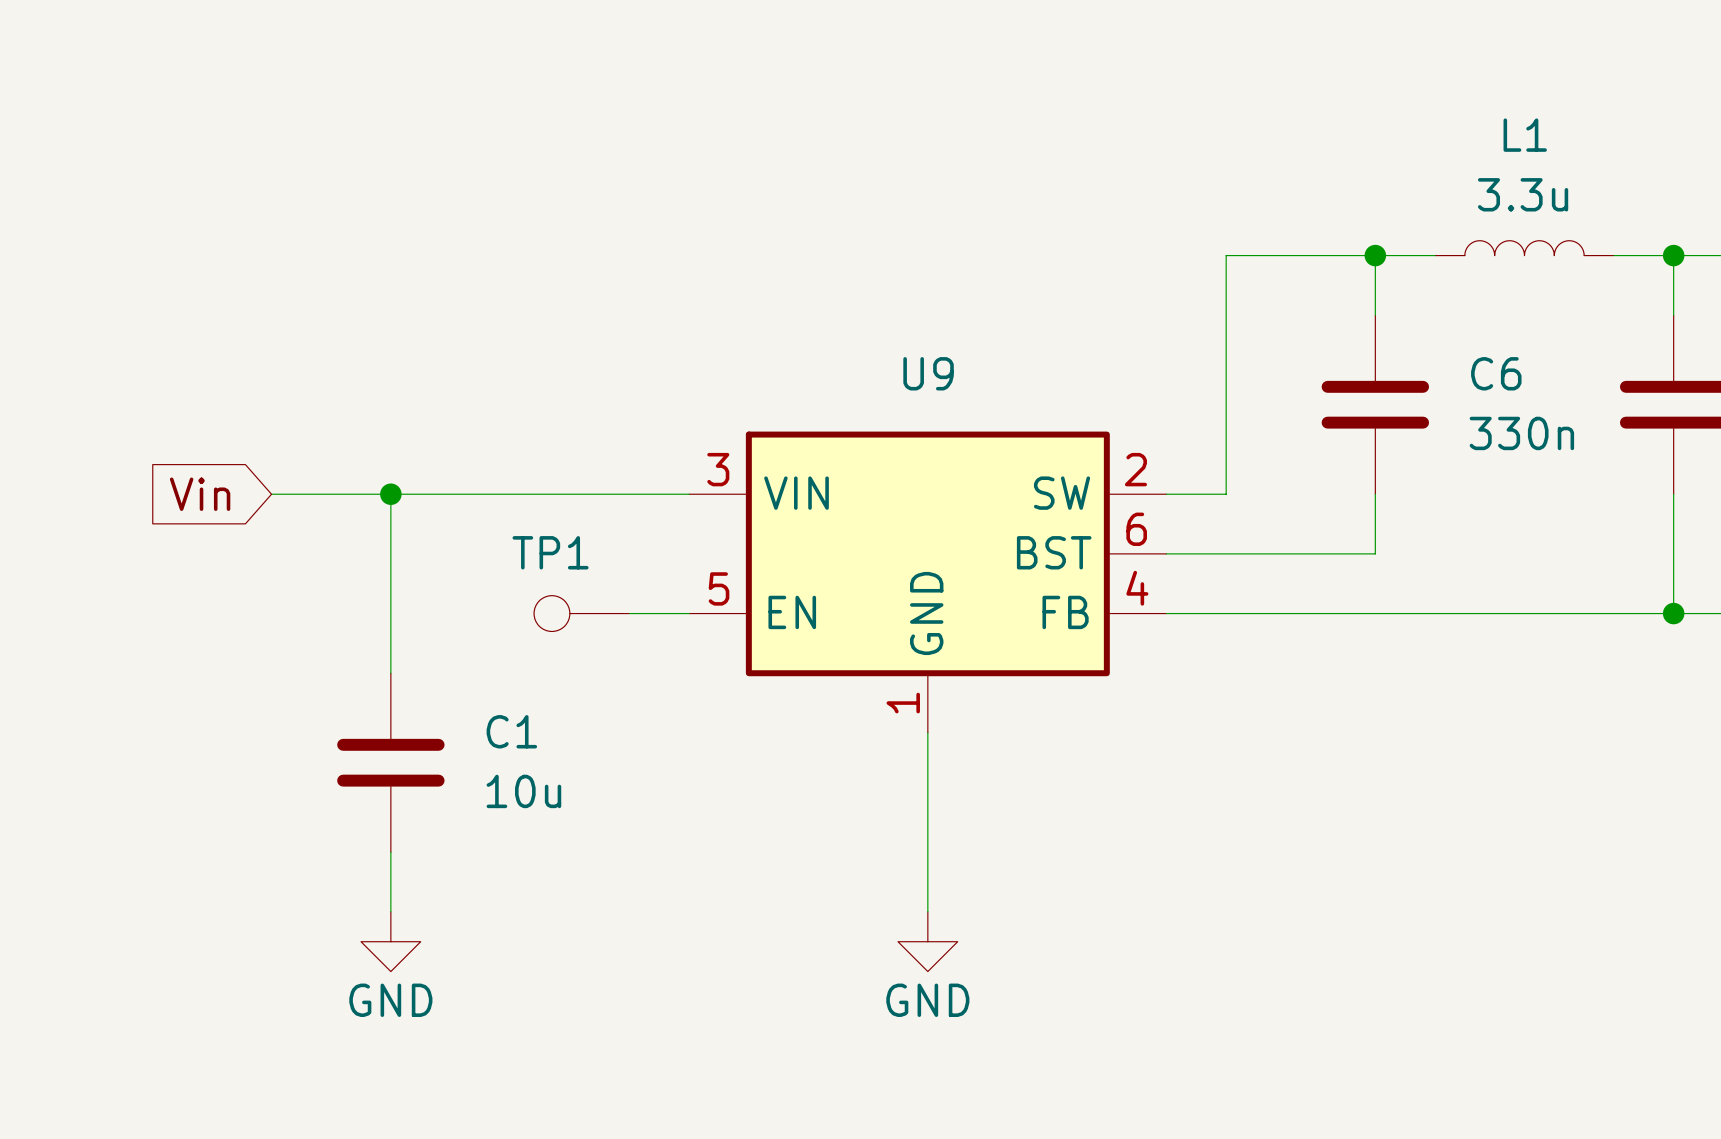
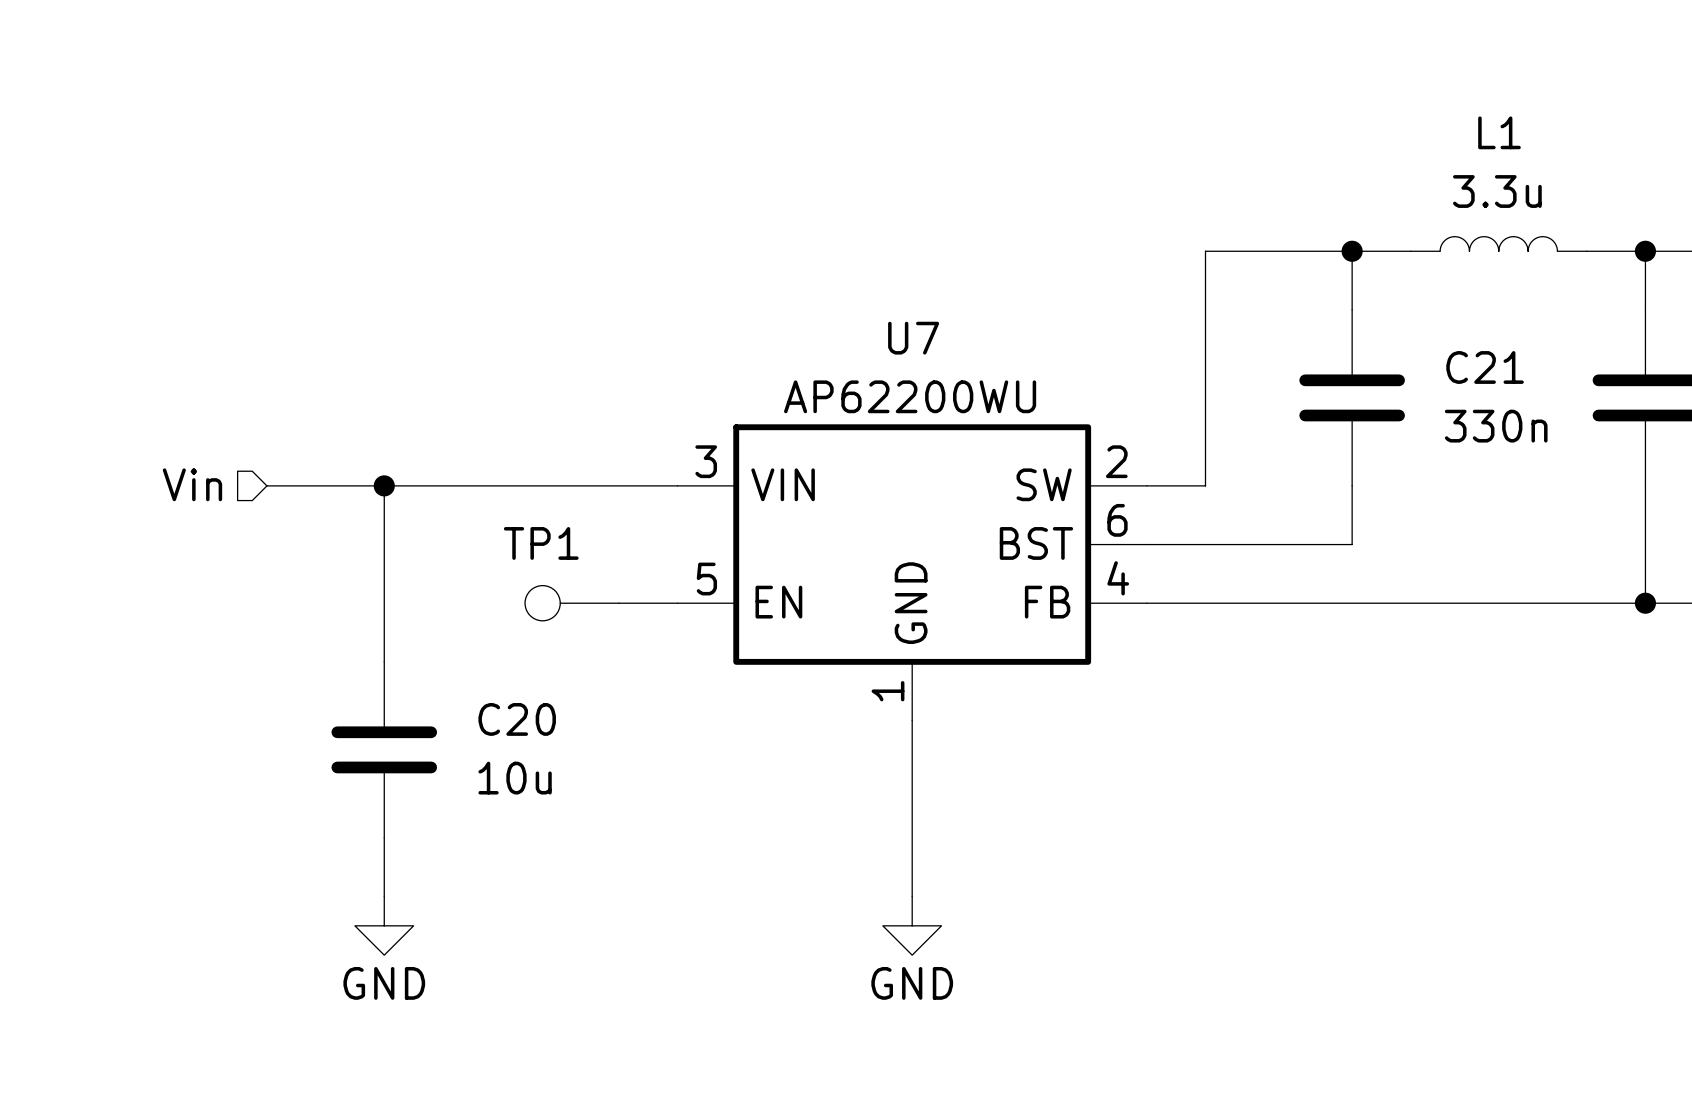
U9 name: U9 (928, 373) -> U7 (913, 338)
C6 name: C6 (1496, 373) -> C21 (1485, 367)
U9 value: none -> AP62200WU (910, 396)
hierarchical label: none -> Vin (192, 484)
global label: Vin (200, 494) -> none
C1 name: C1 (511, 731) -> C20 (517, 719)

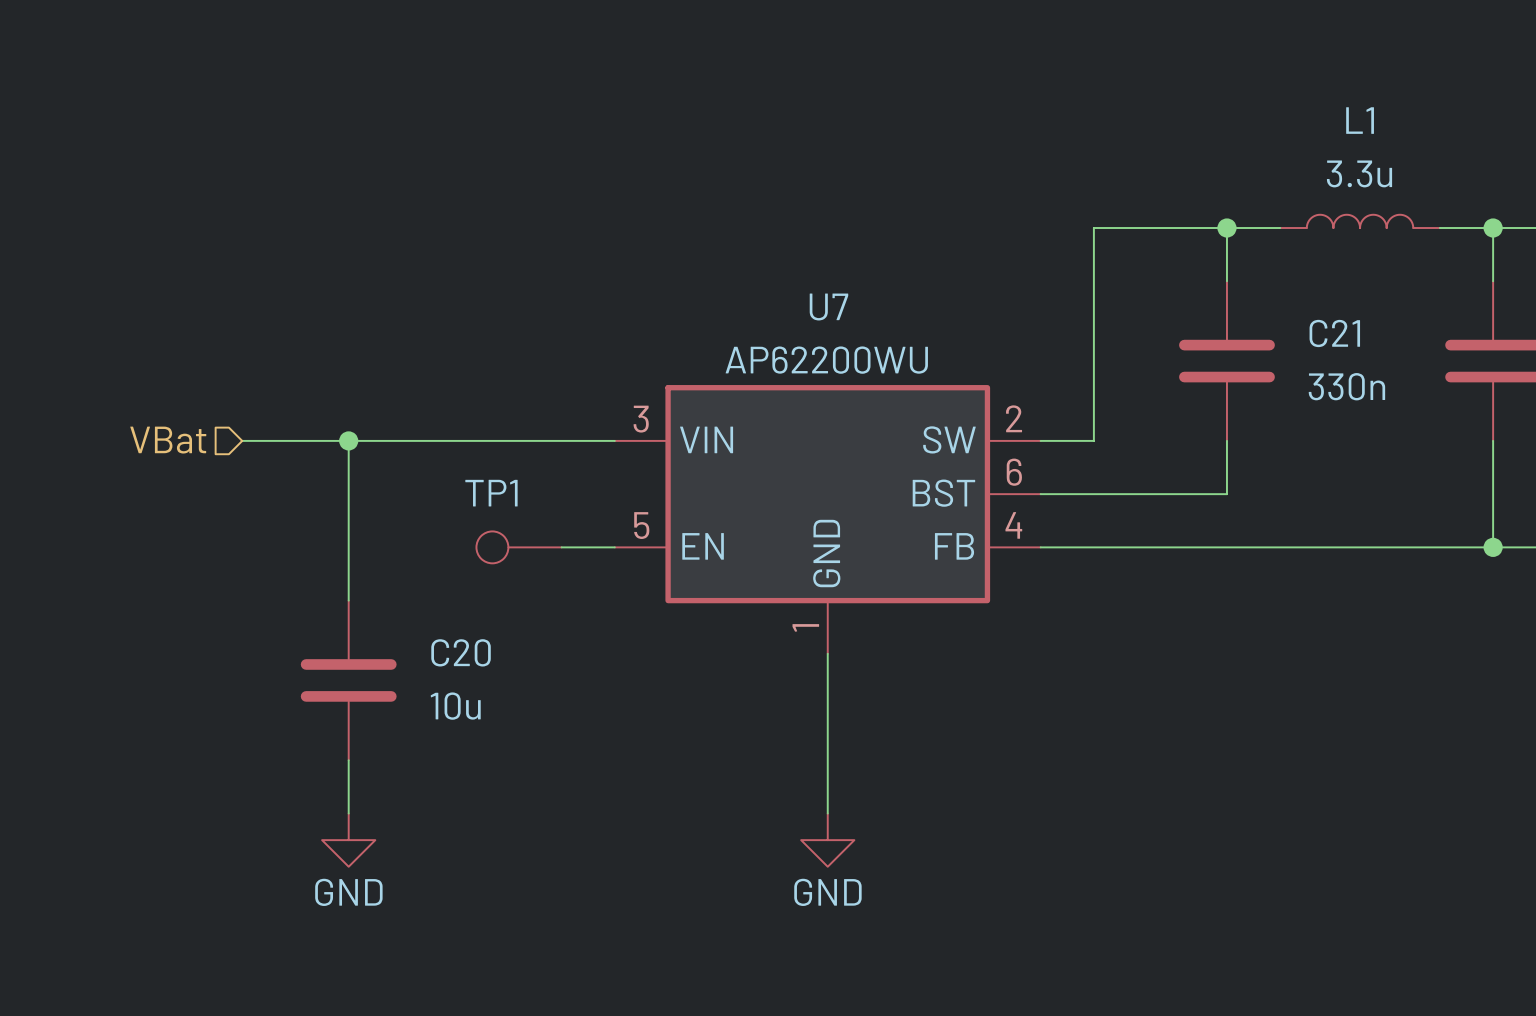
hierarchical label: Vin (192, 484) -> VBat (168, 440)

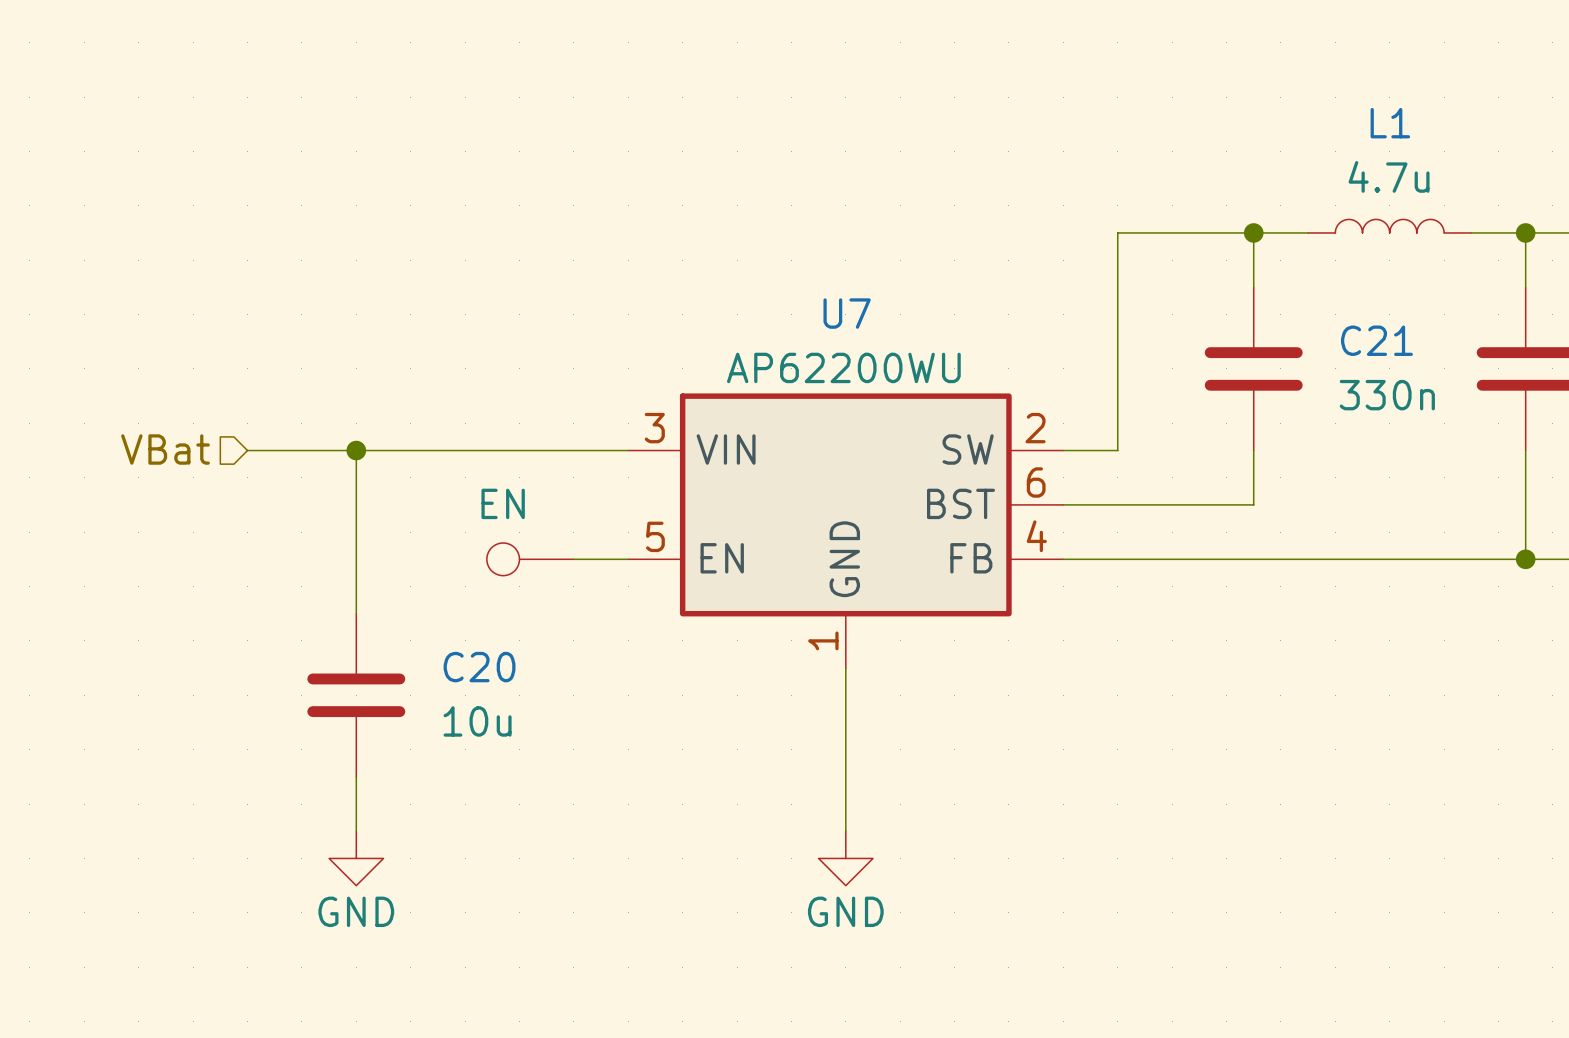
L1 value: 3.3u (1359, 173) -> 4.7u (1389, 176)
part value: TP1 (491, 493) -> EN (503, 503)

